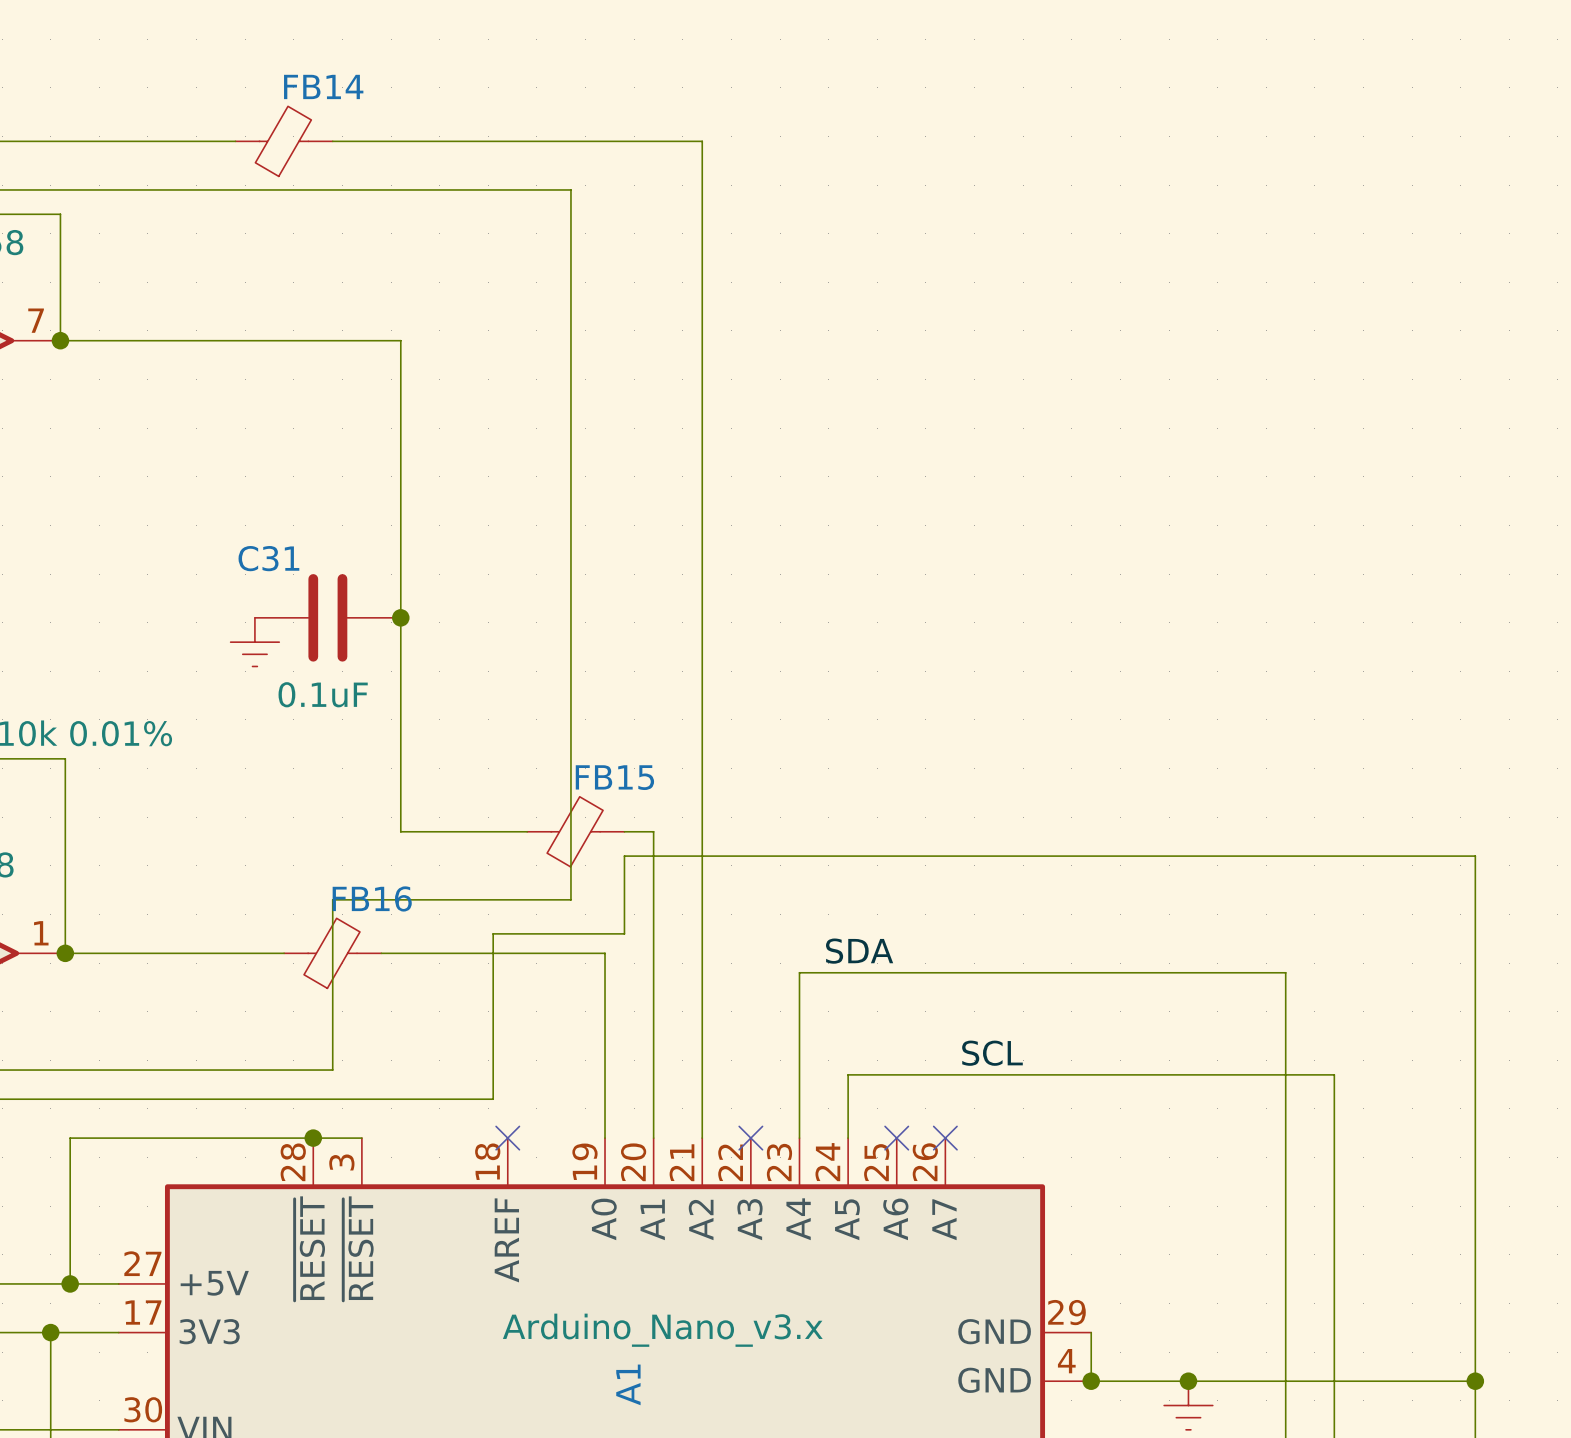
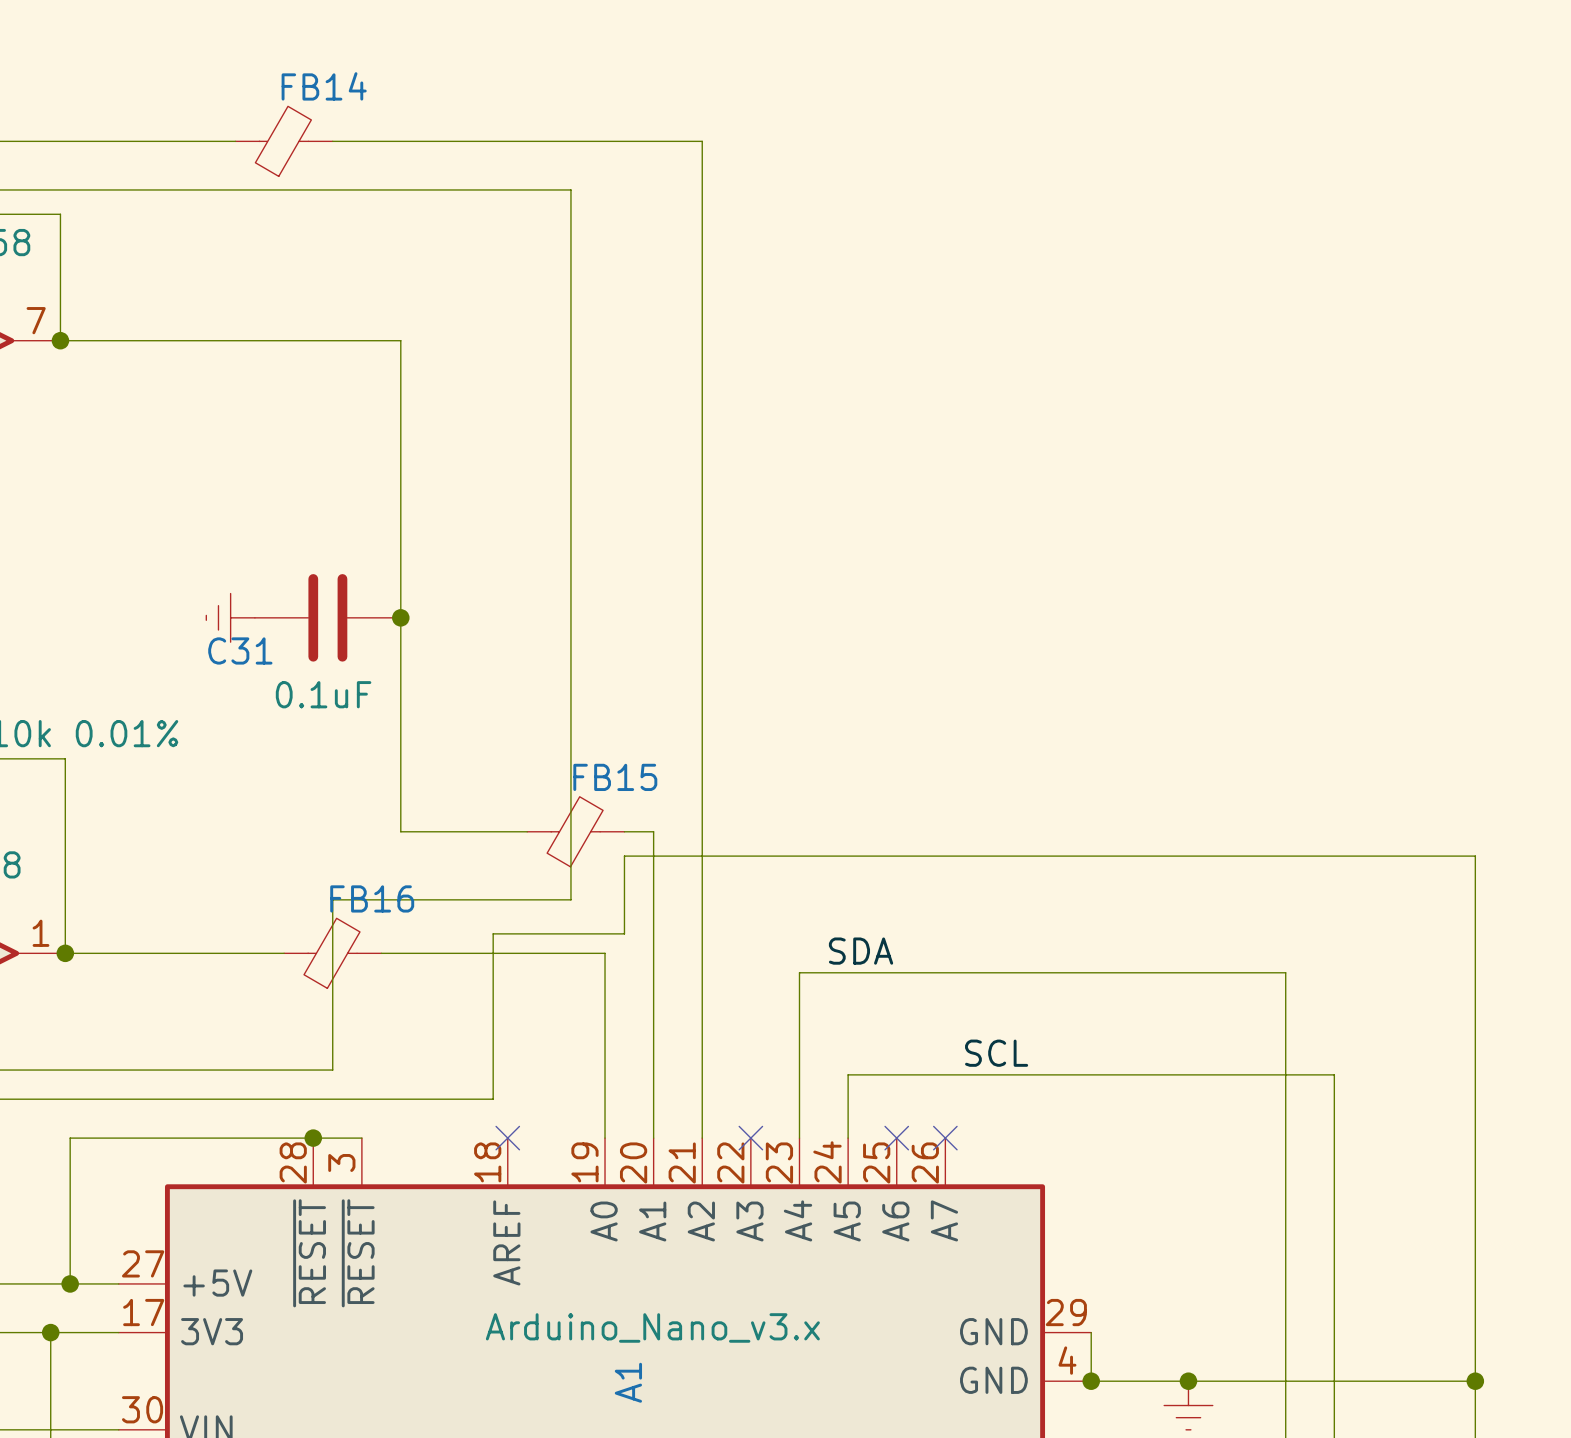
C31 name position: C31 (268, 558) -> C31 (240, 650)
power symbol rotation: 0° (254, 642) -> 90° clockwise (230, 617)
power symbol position: (254, 642) -> (230, 617)

